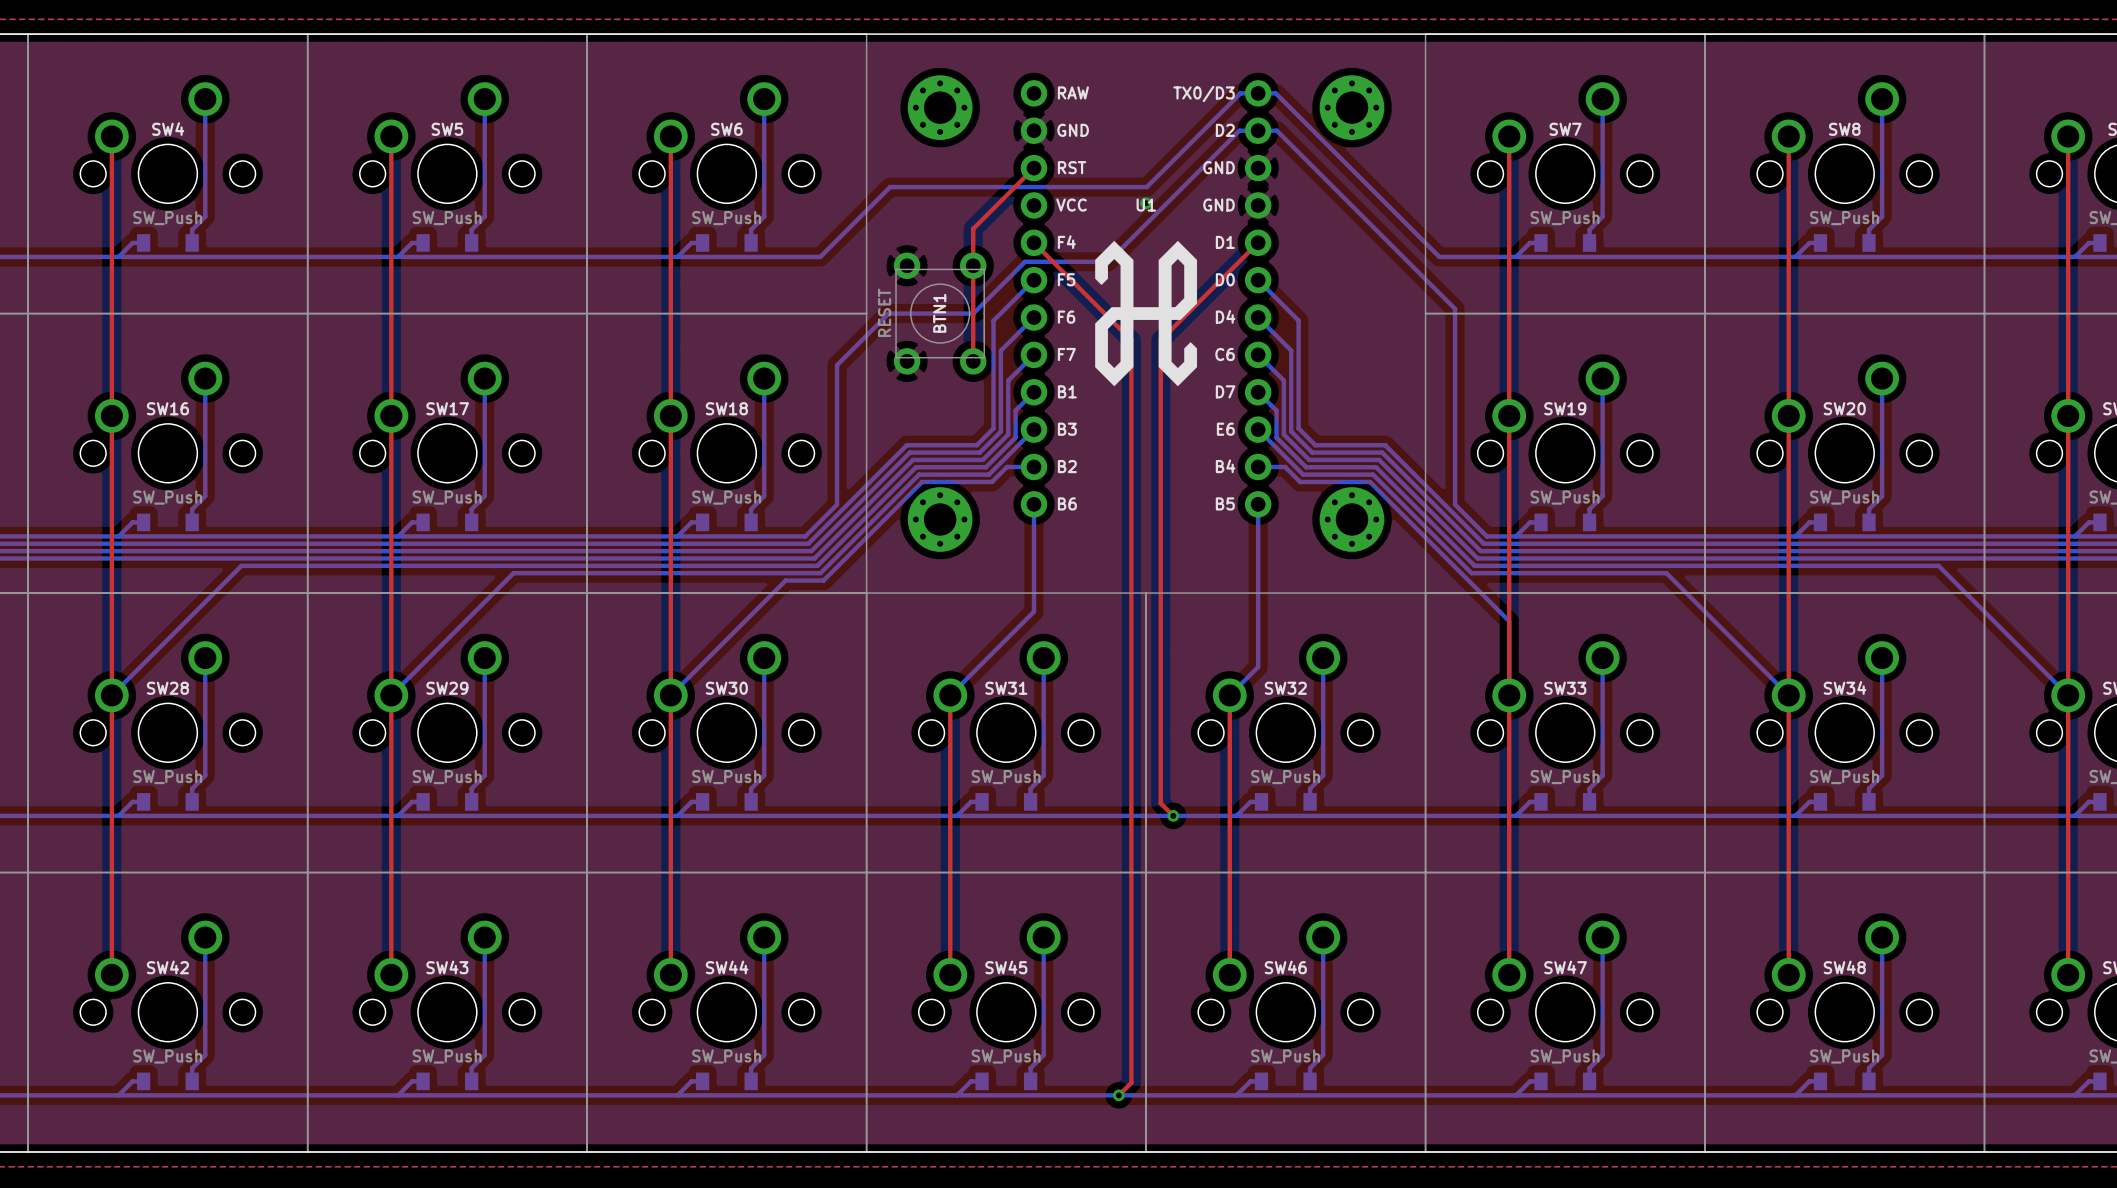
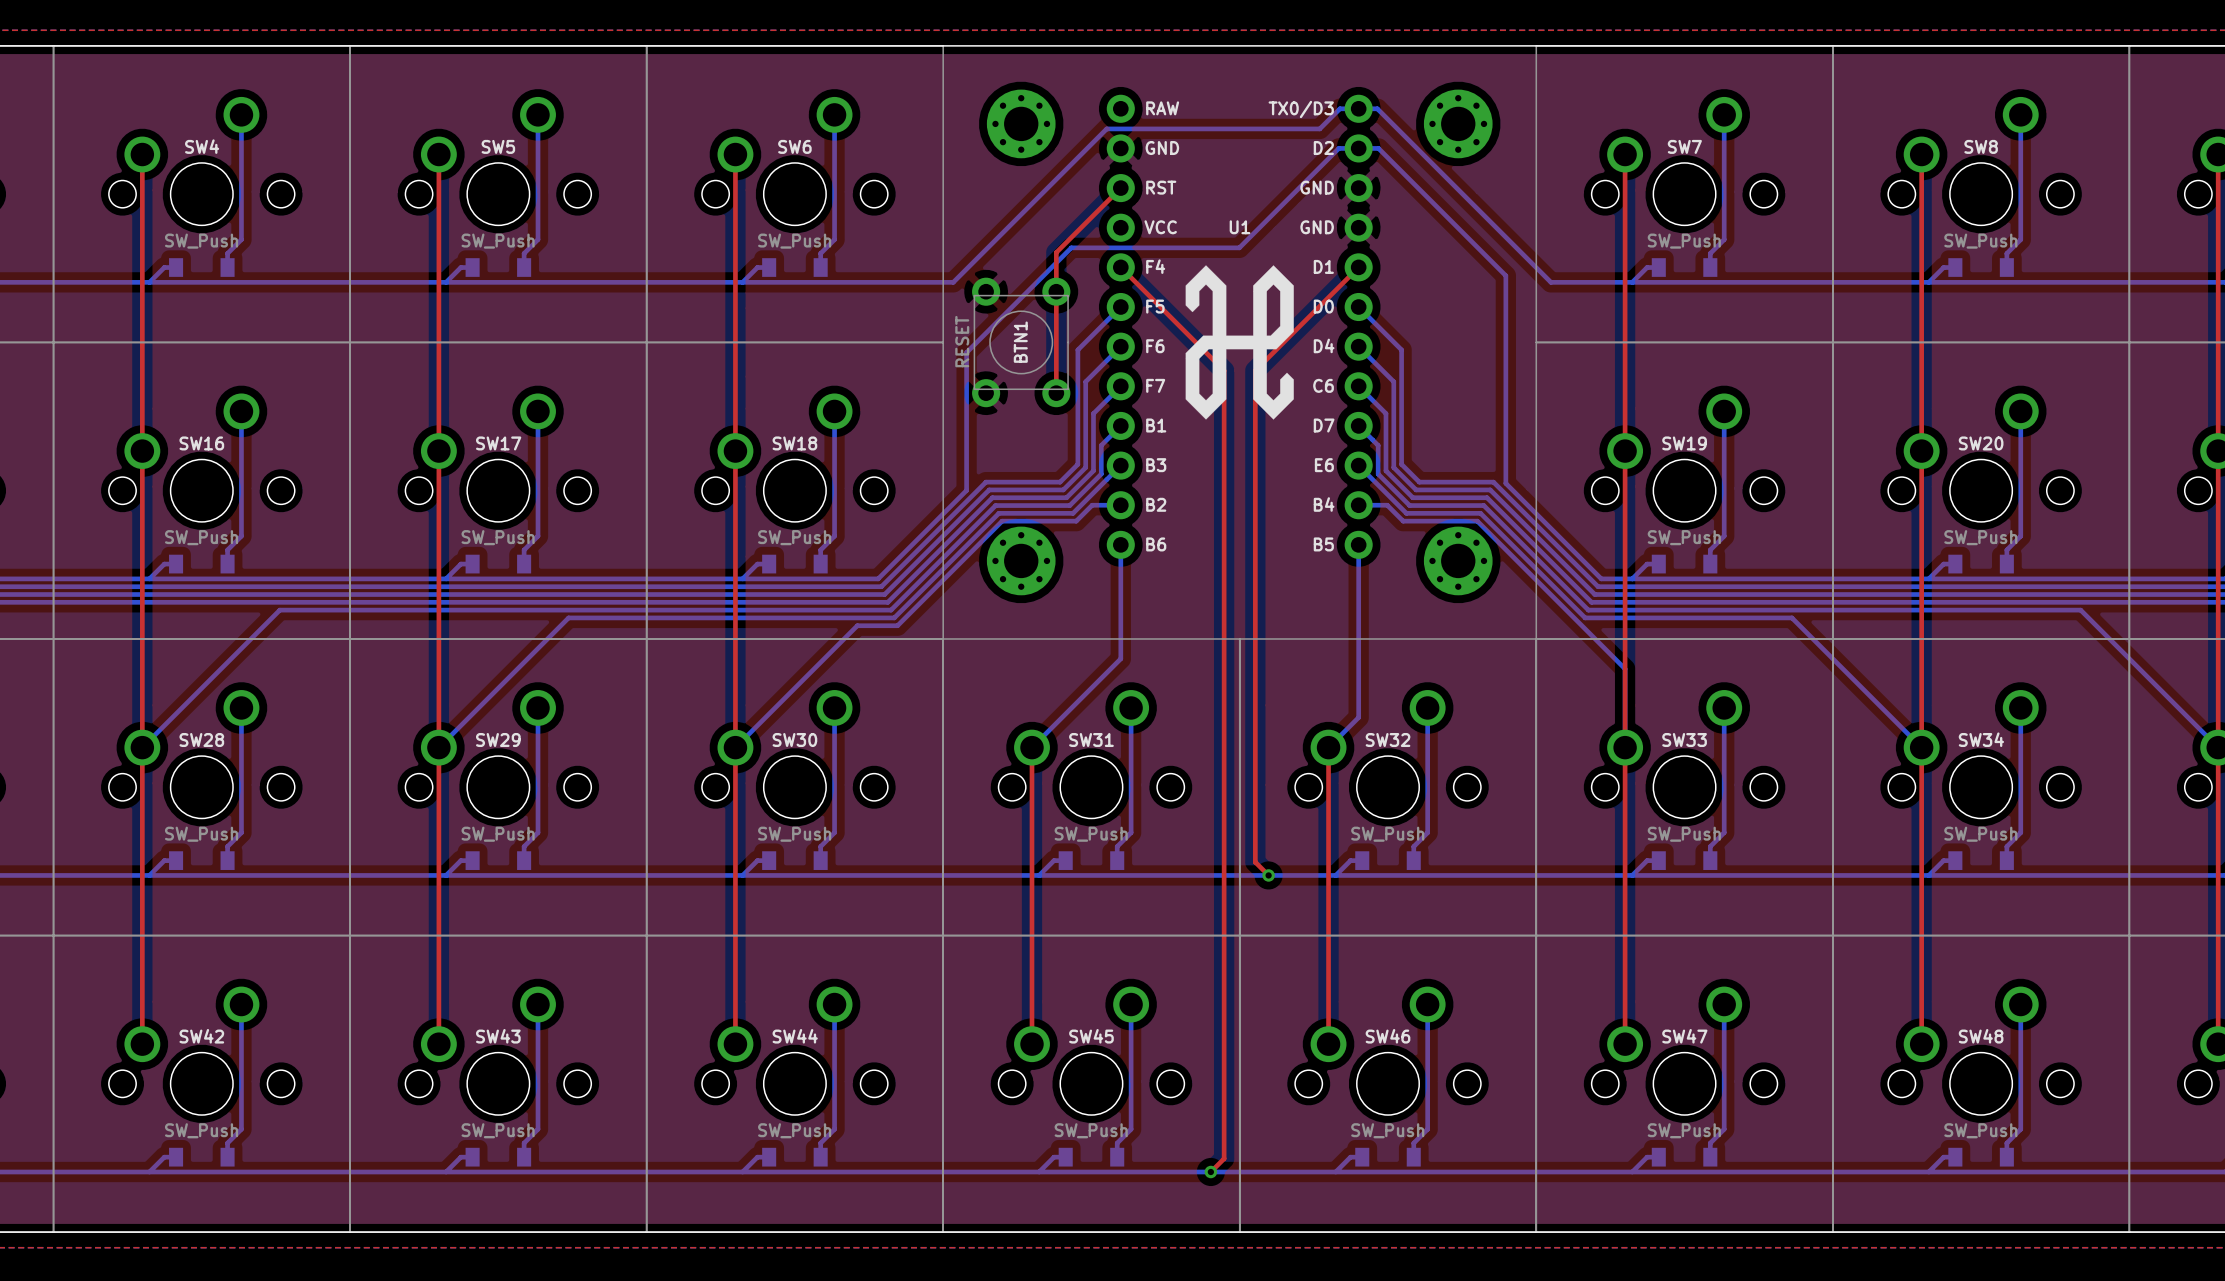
bottom track: (1221, 112) (1146, 187) (890, 187) (820, 256) -> (1319, 128) (1106, 128) (953, 282) (894, 282)
via: (1146, 203) -> none
bottom track: (1145, 224) (1108, 261) (1025, 261) (973, 313) (888, 313) (837, 365) (837, 504) -> (1239, 247) (1071, 247) (966, 352) (966, 490) (911, 545)
bottom track: (1396, 250) (1455, 308) (1455, 504) -> (1505, 275) (1505, 483) (1567, 545)

